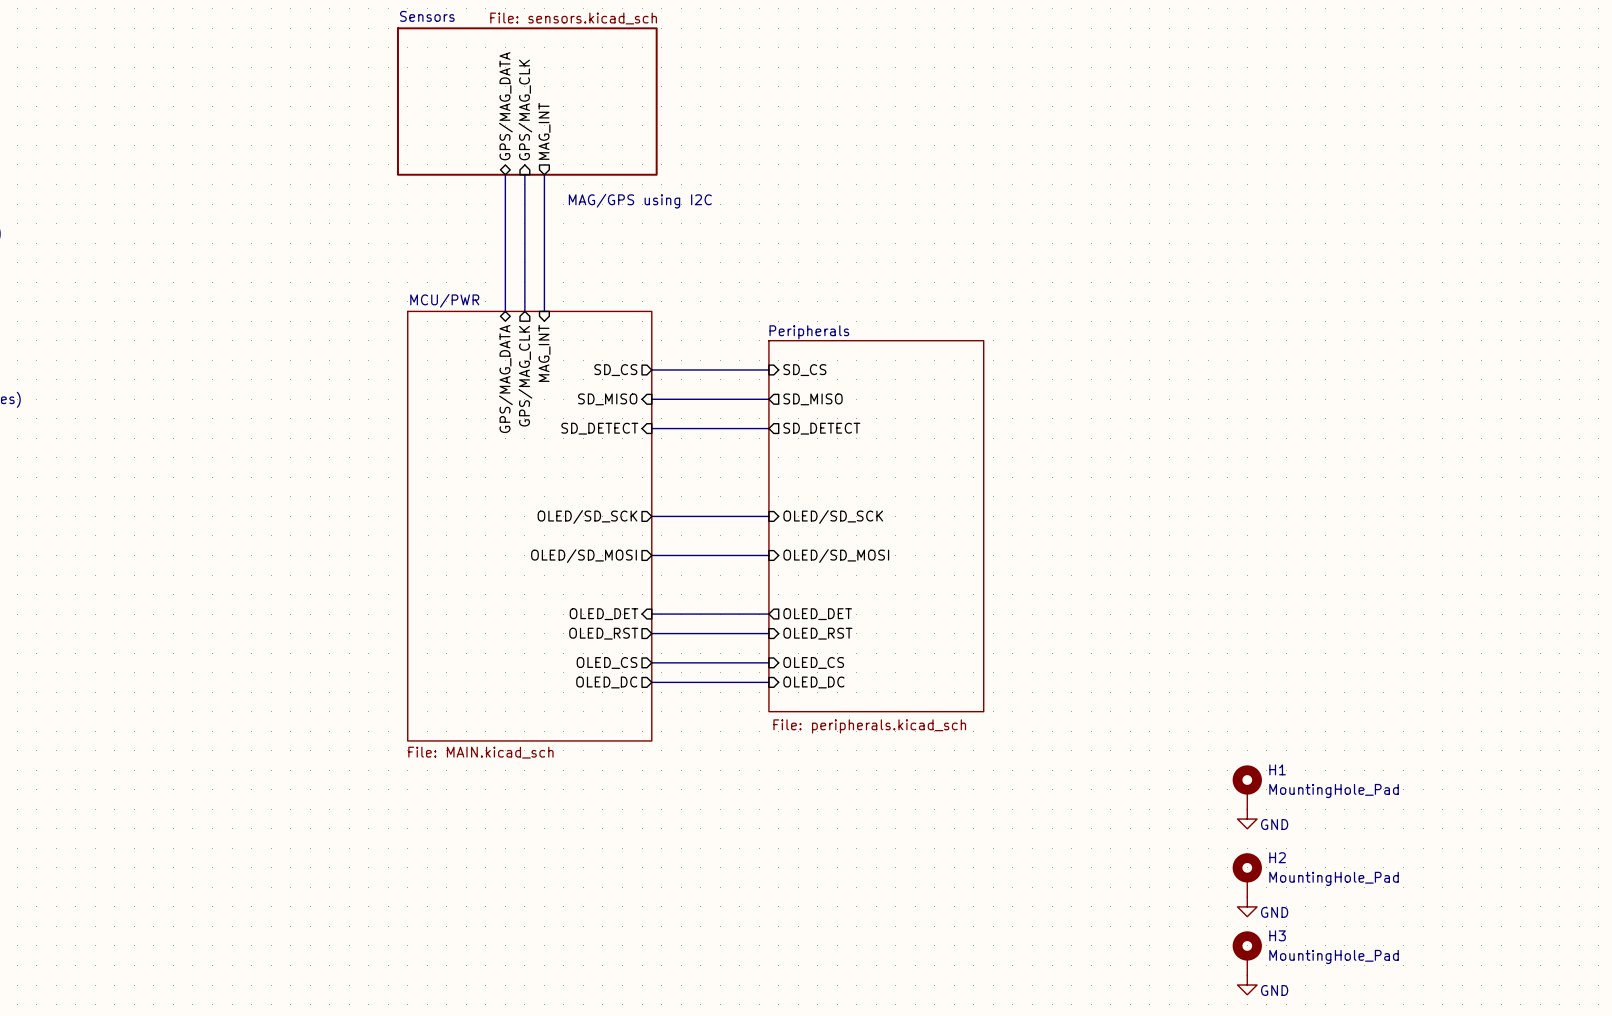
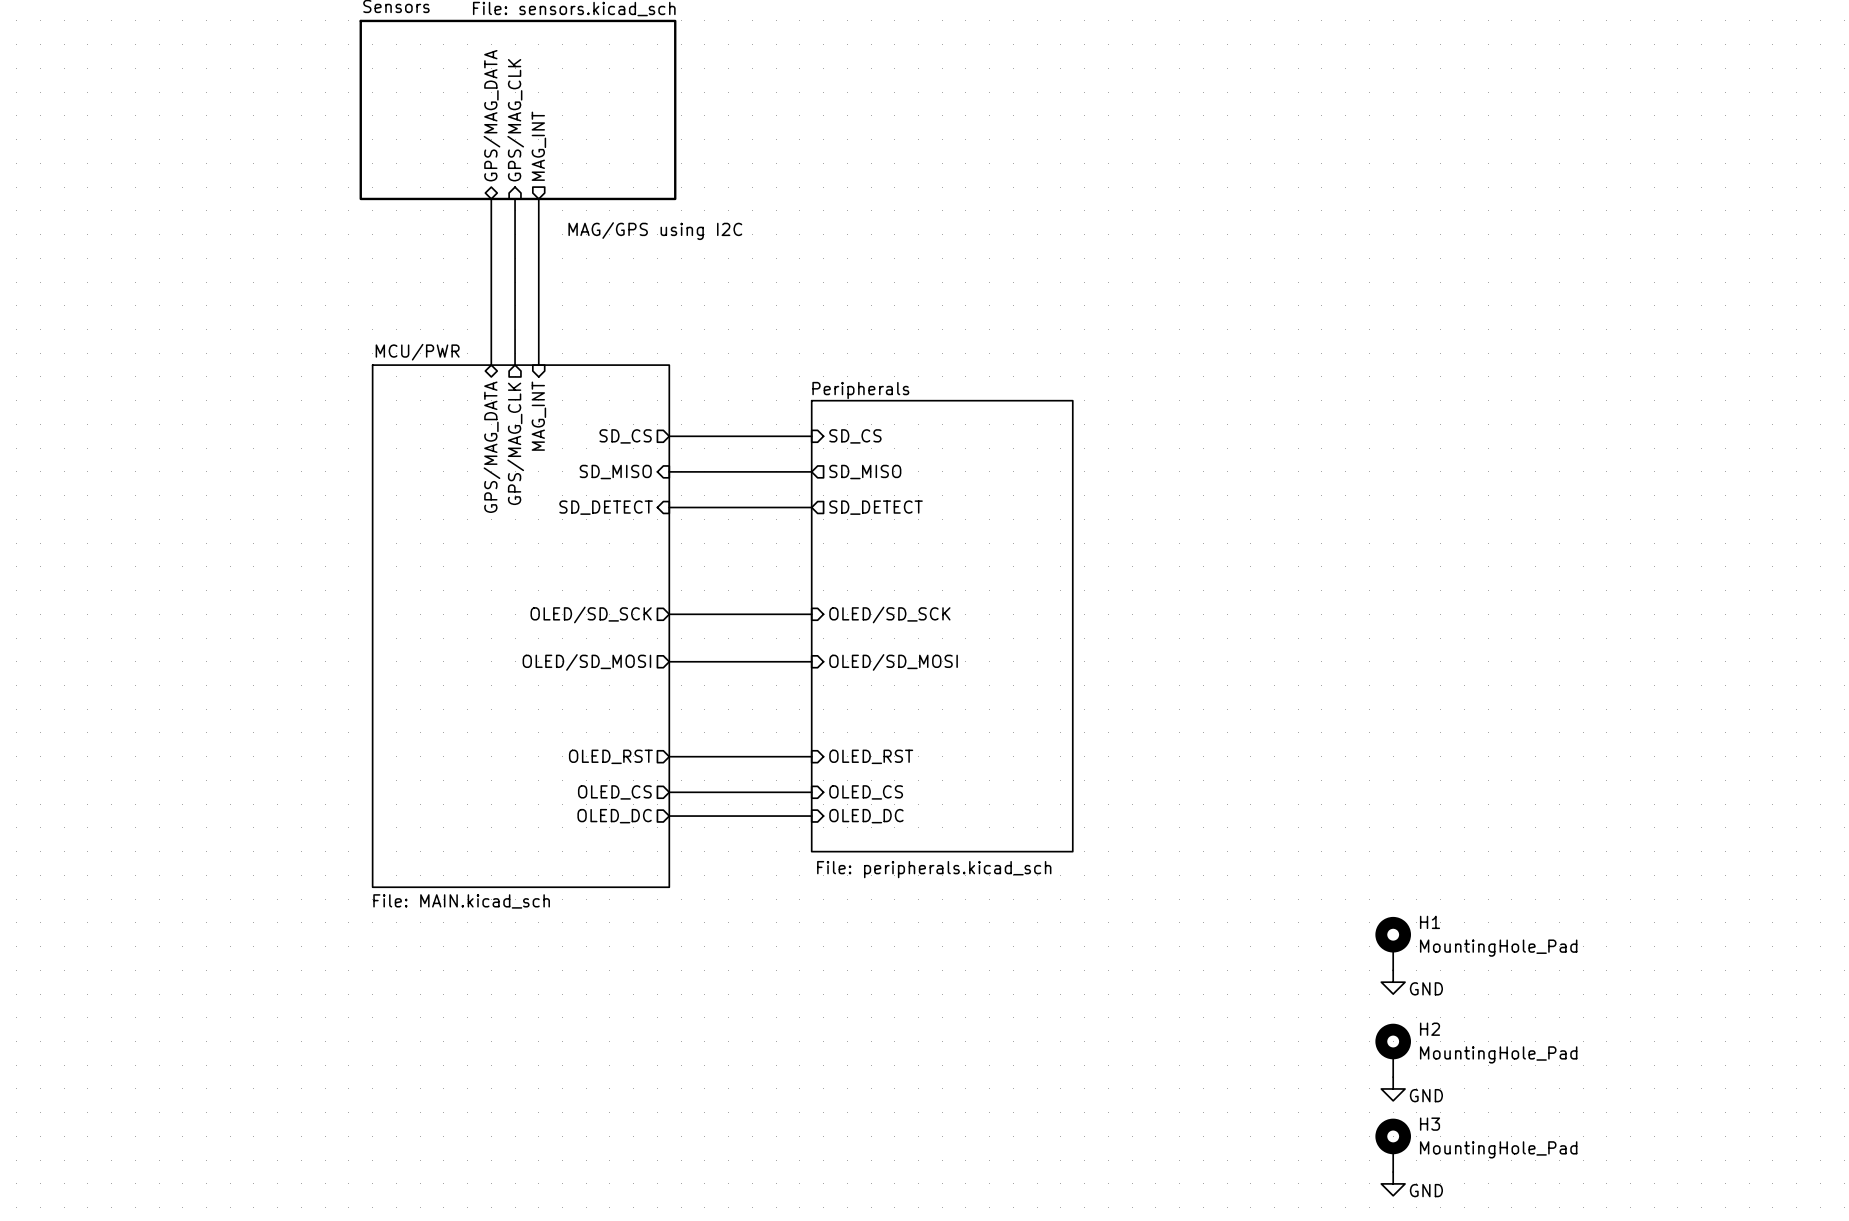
sheet pin: OLED_DET (603, 614) -> none
wire: (651, 614) (768, 614) -> none
sheet pin: OLED_DET (817, 614) -> none

